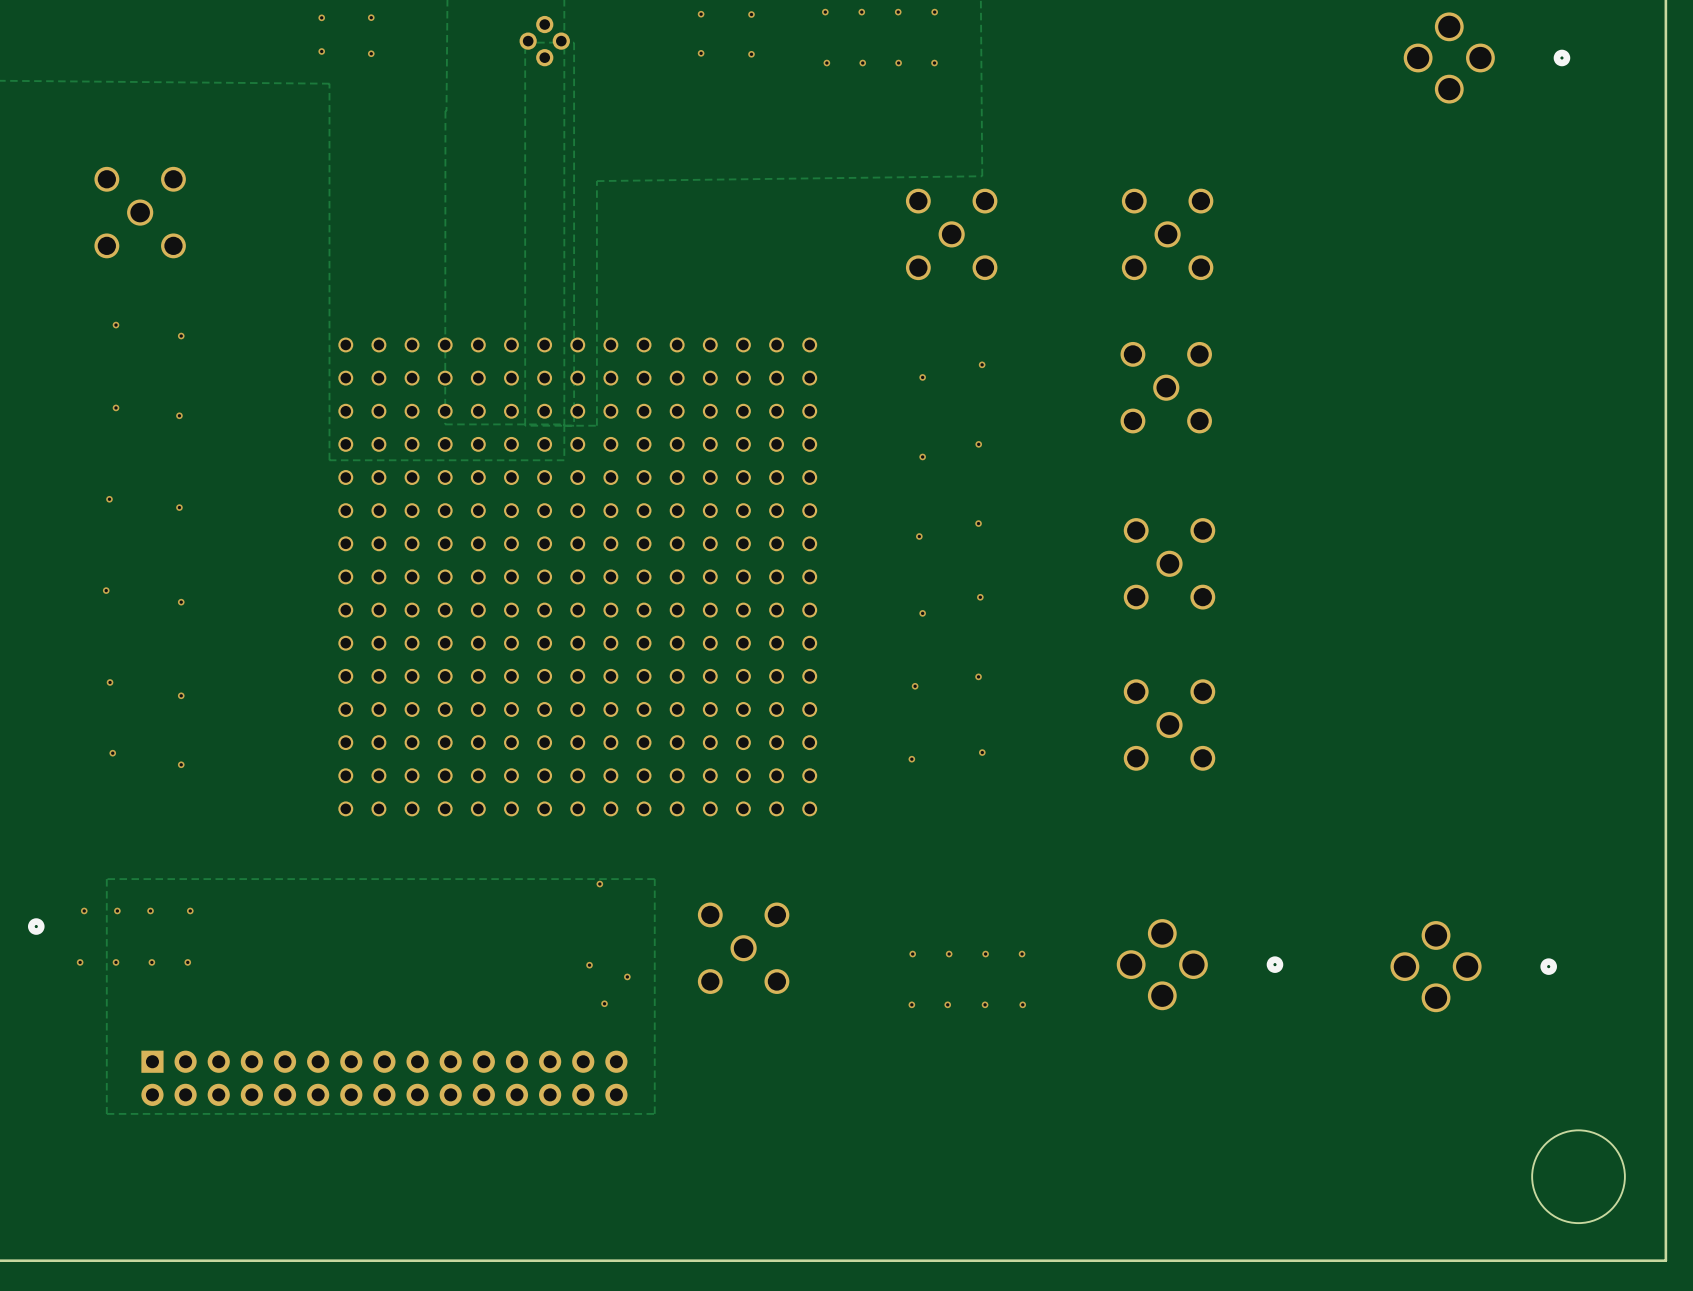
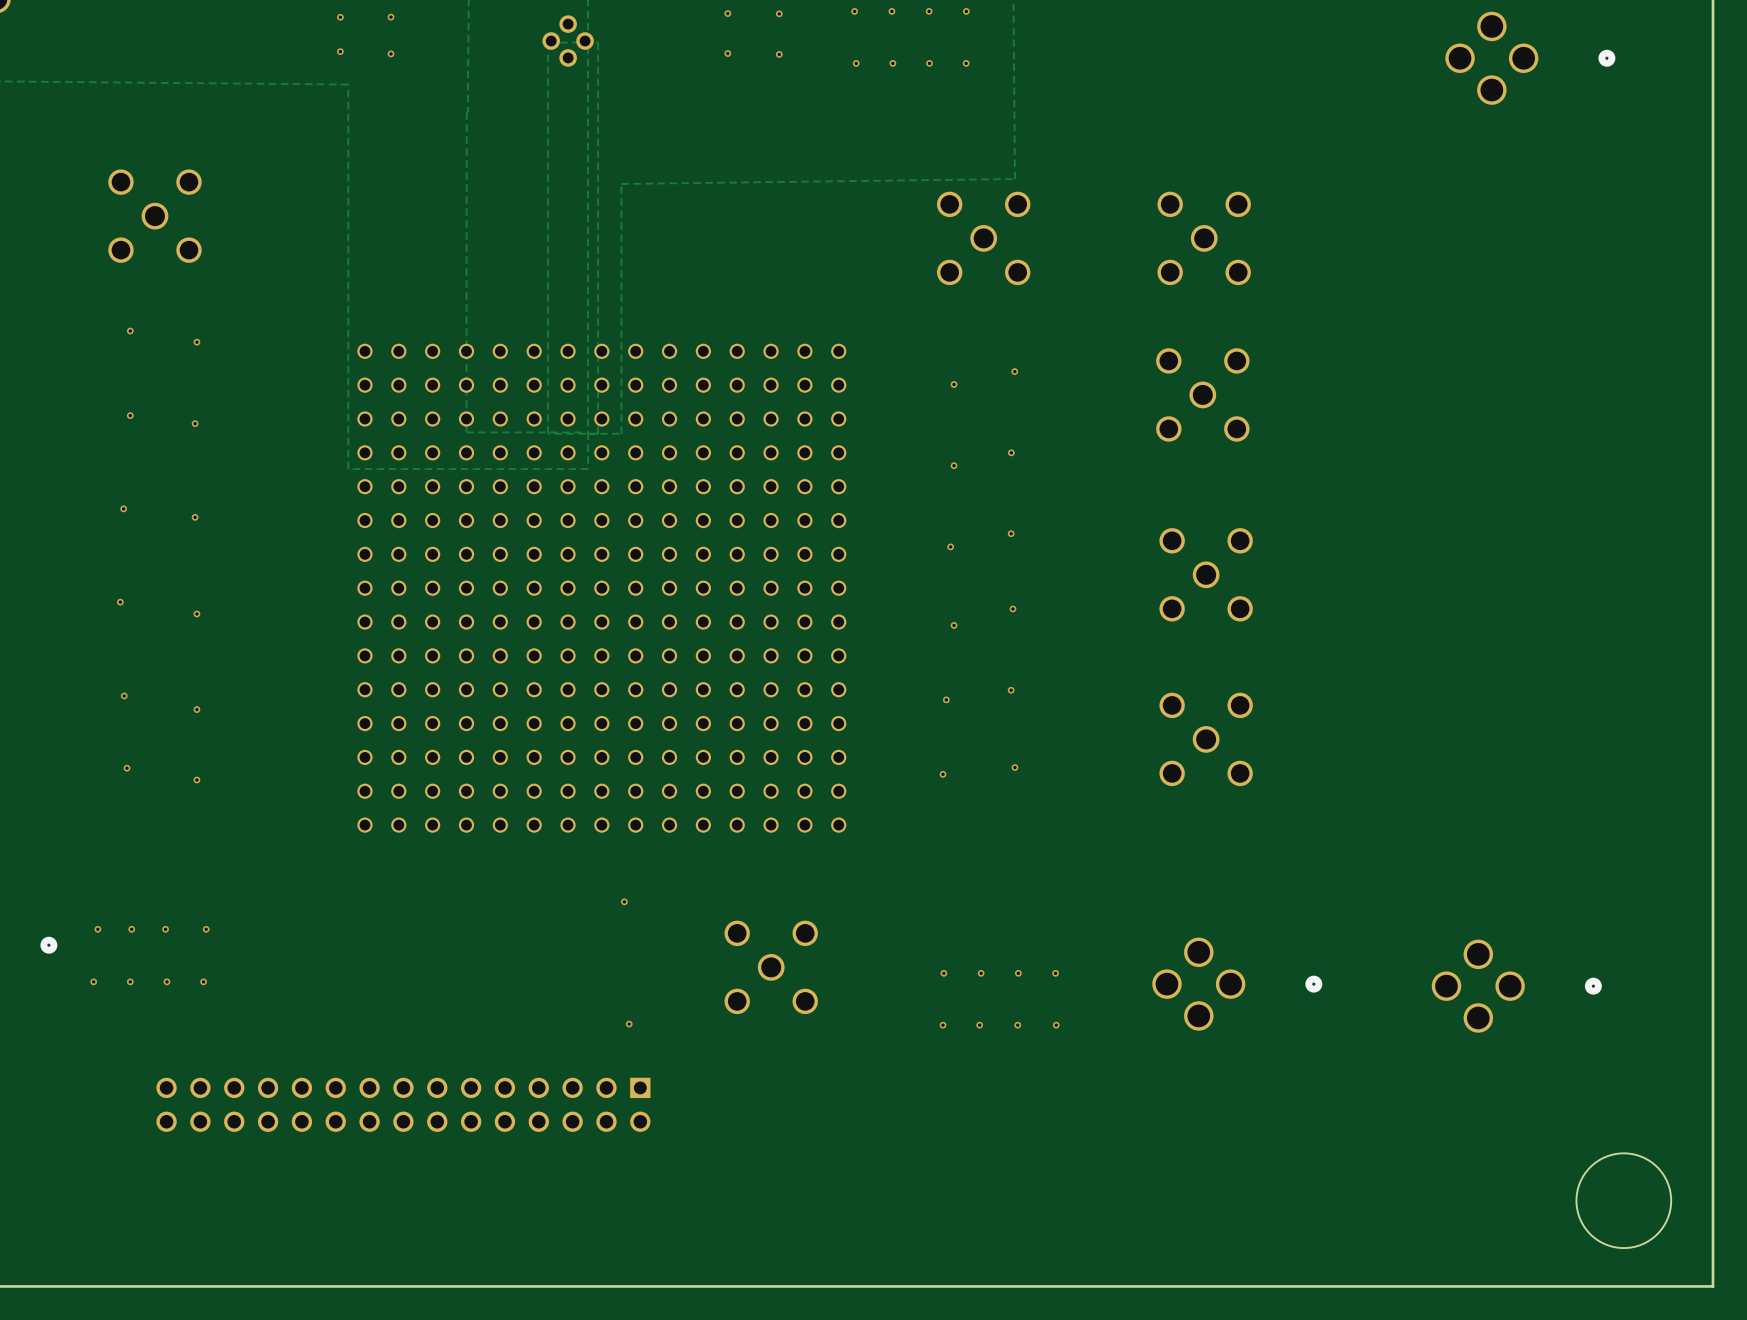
zone outline: (654, 879) (106, 879) (106, 1113) (654, 1113) (654, 879) -> none
via: (589, 965) -> none
via: (627, 976) -> none
part footprint: [141, 1050, 628, 1106] -> [156, 1077, 651, 1132]

